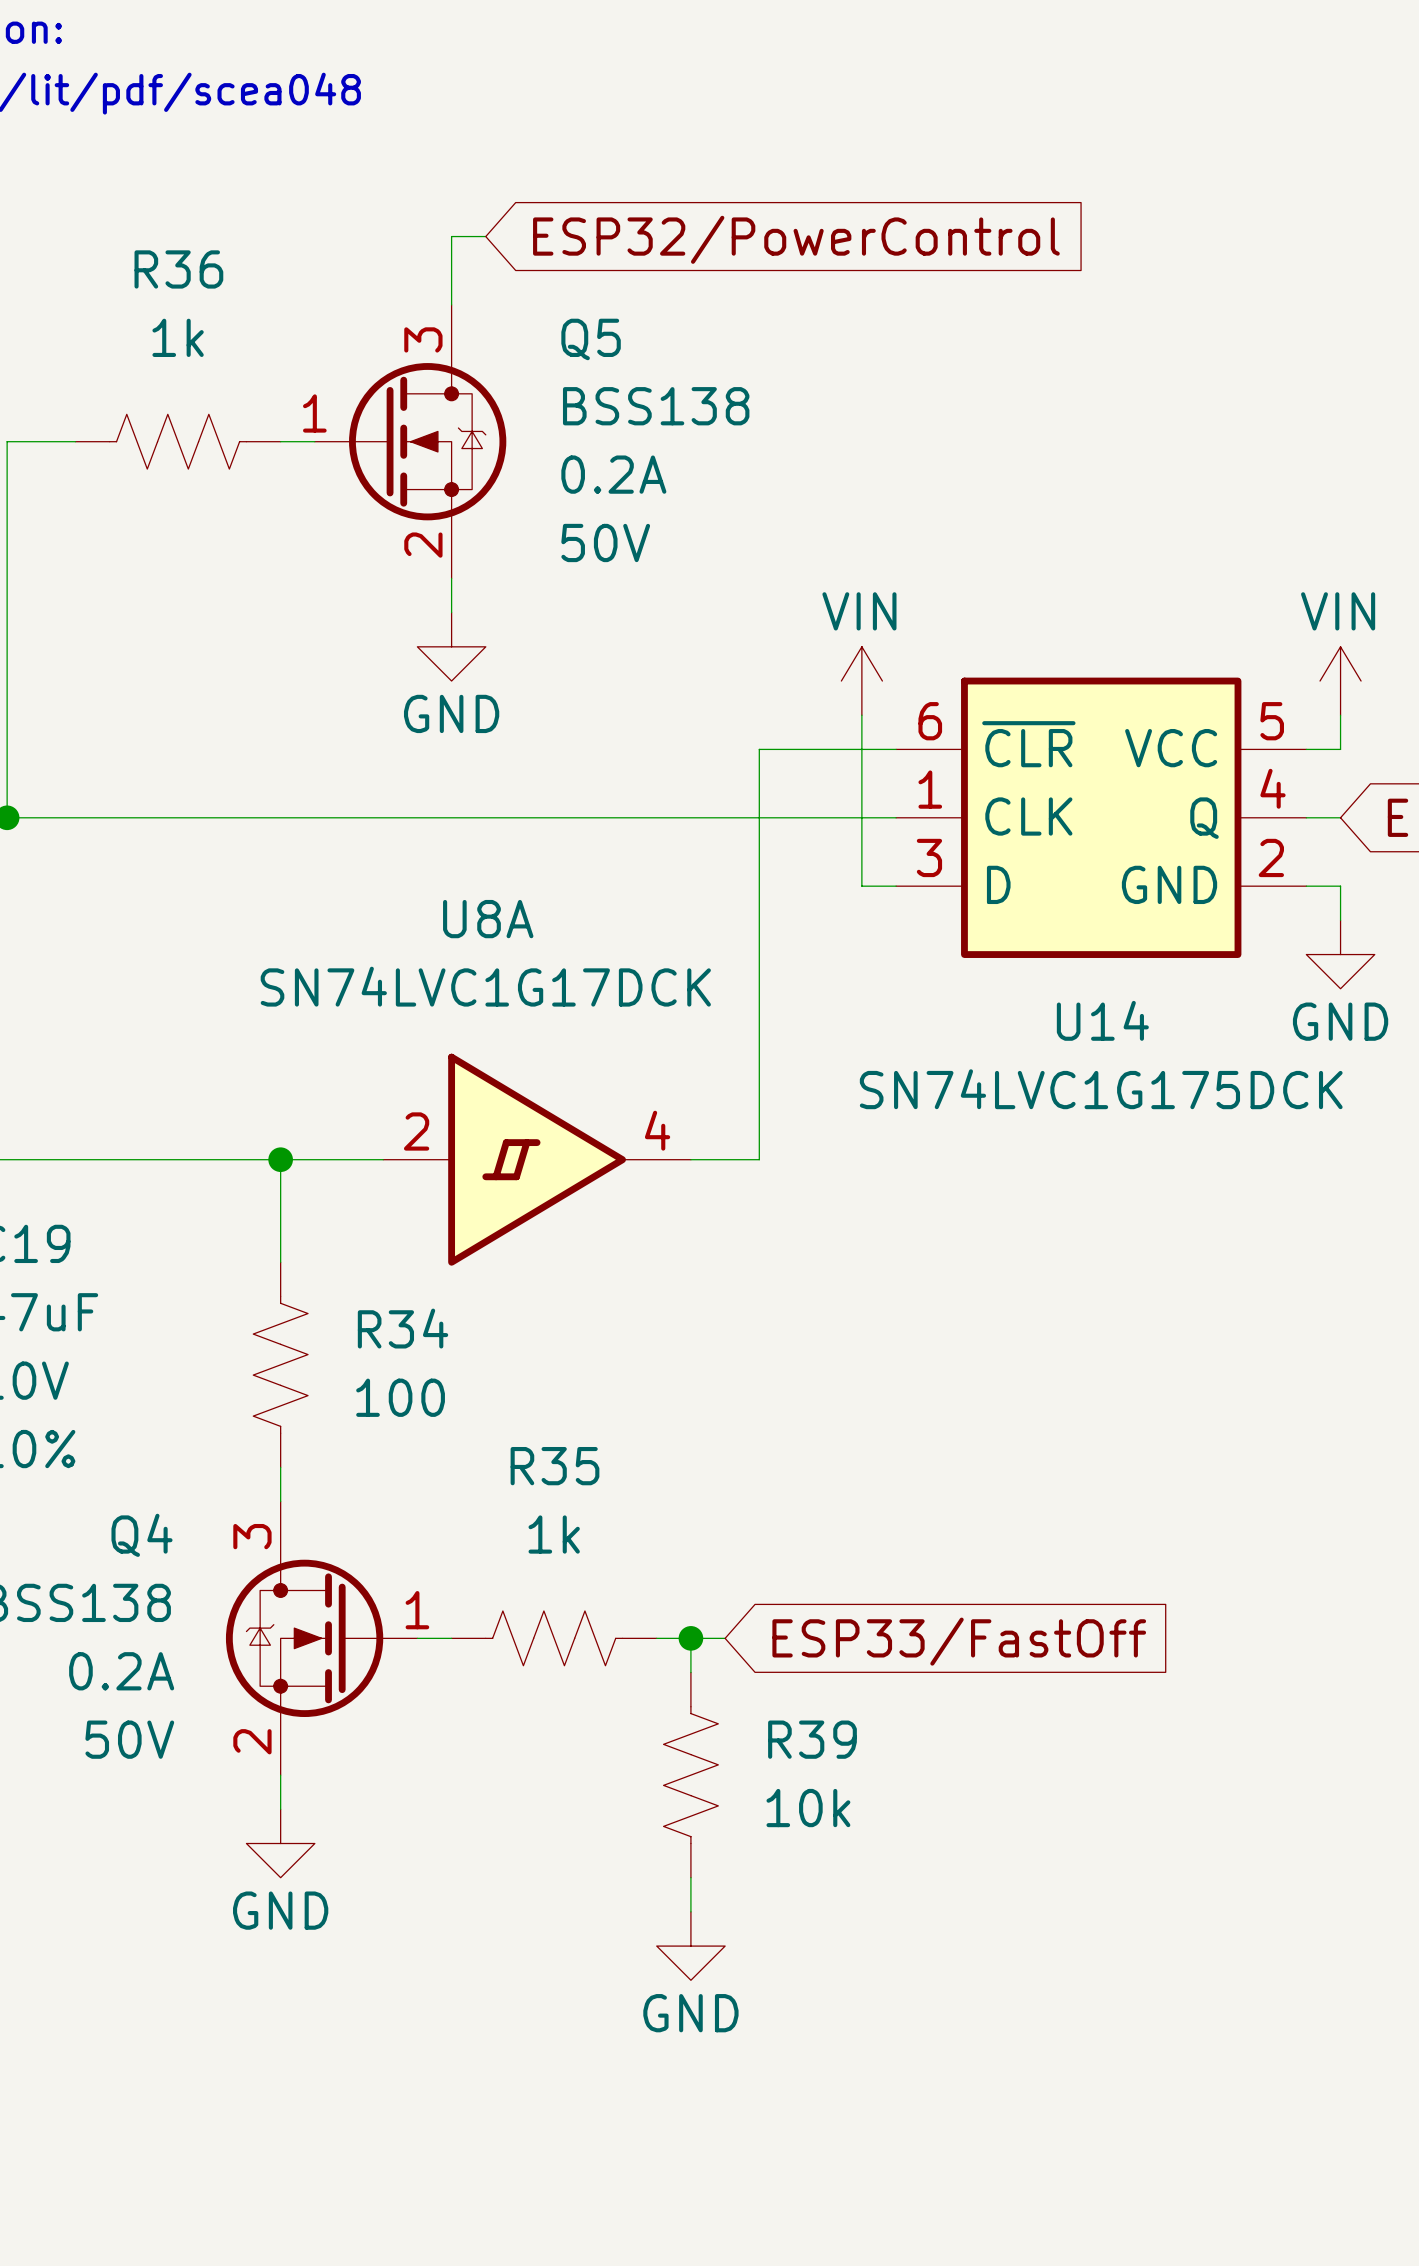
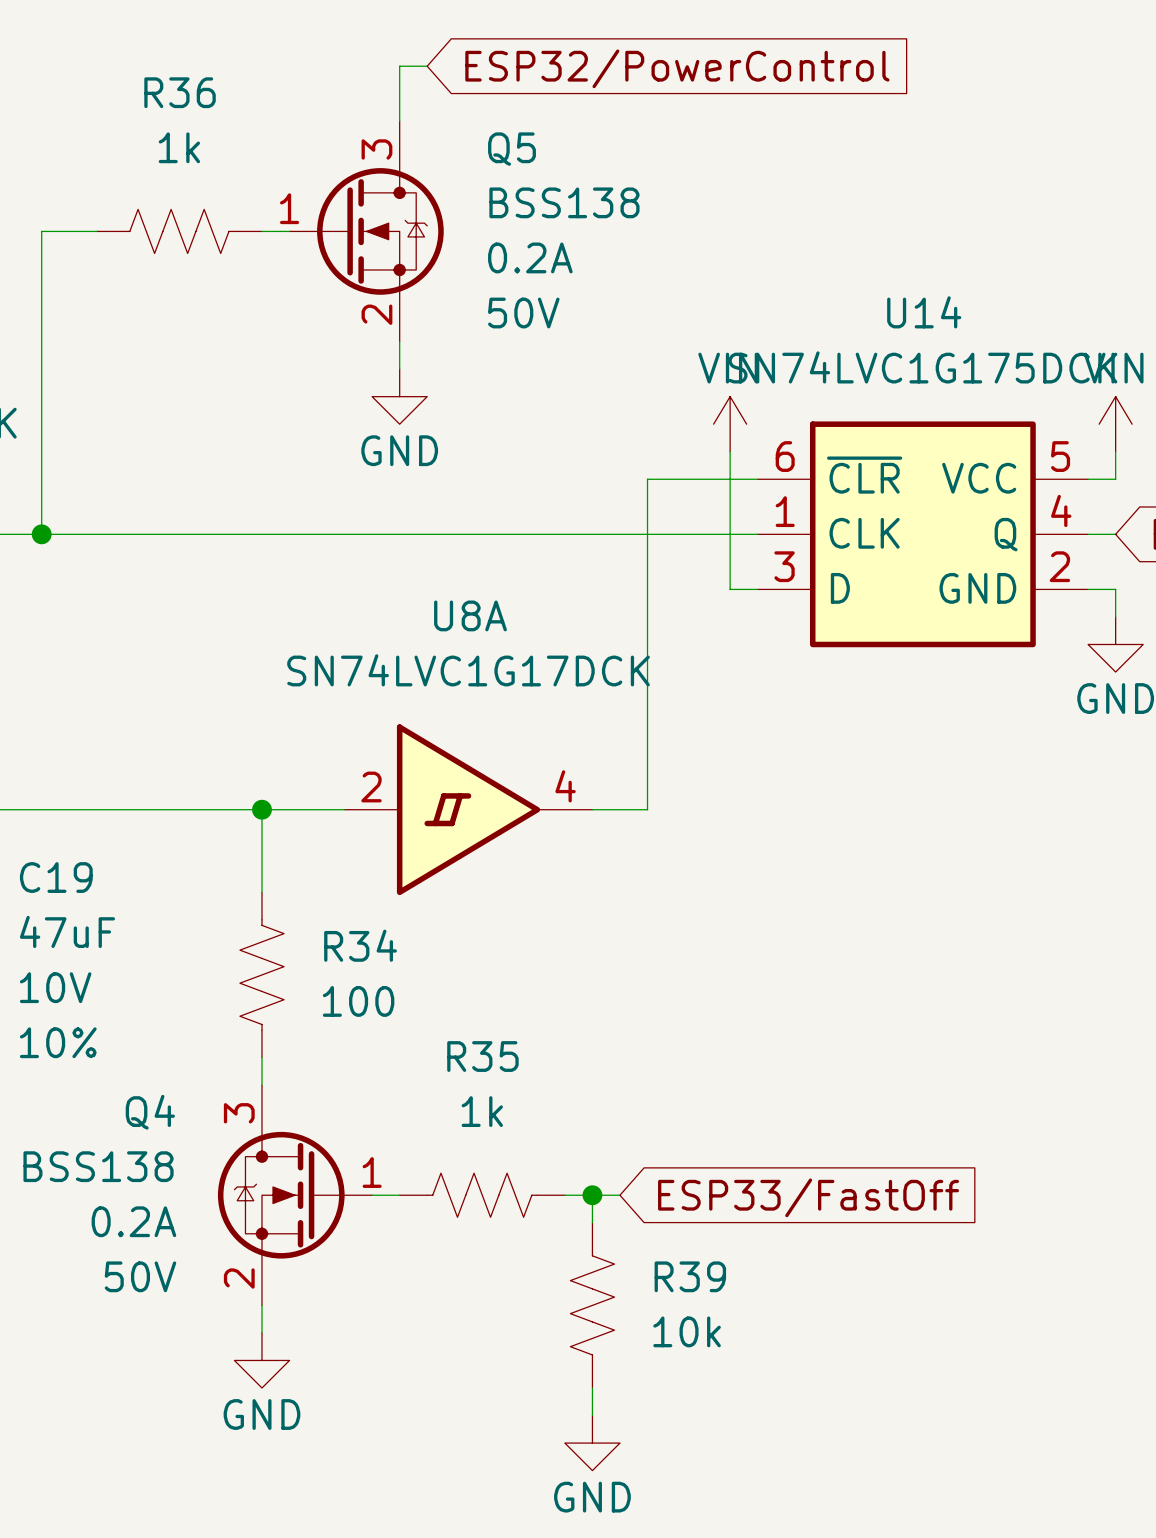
U8A name position: U8A (488, 919) -> U8A (470, 615)
U8A value position: SN74LVC1G17DCK (485, 986) -> SN74LVC1G17DCK (468, 670)
U14 name position: U14 (1102, 1020) -> U14 (924, 312)
U14 value position: SN74LVC1G175DCK (1101, 1089) -> SN74LVC1G175DCK (922, 367)

